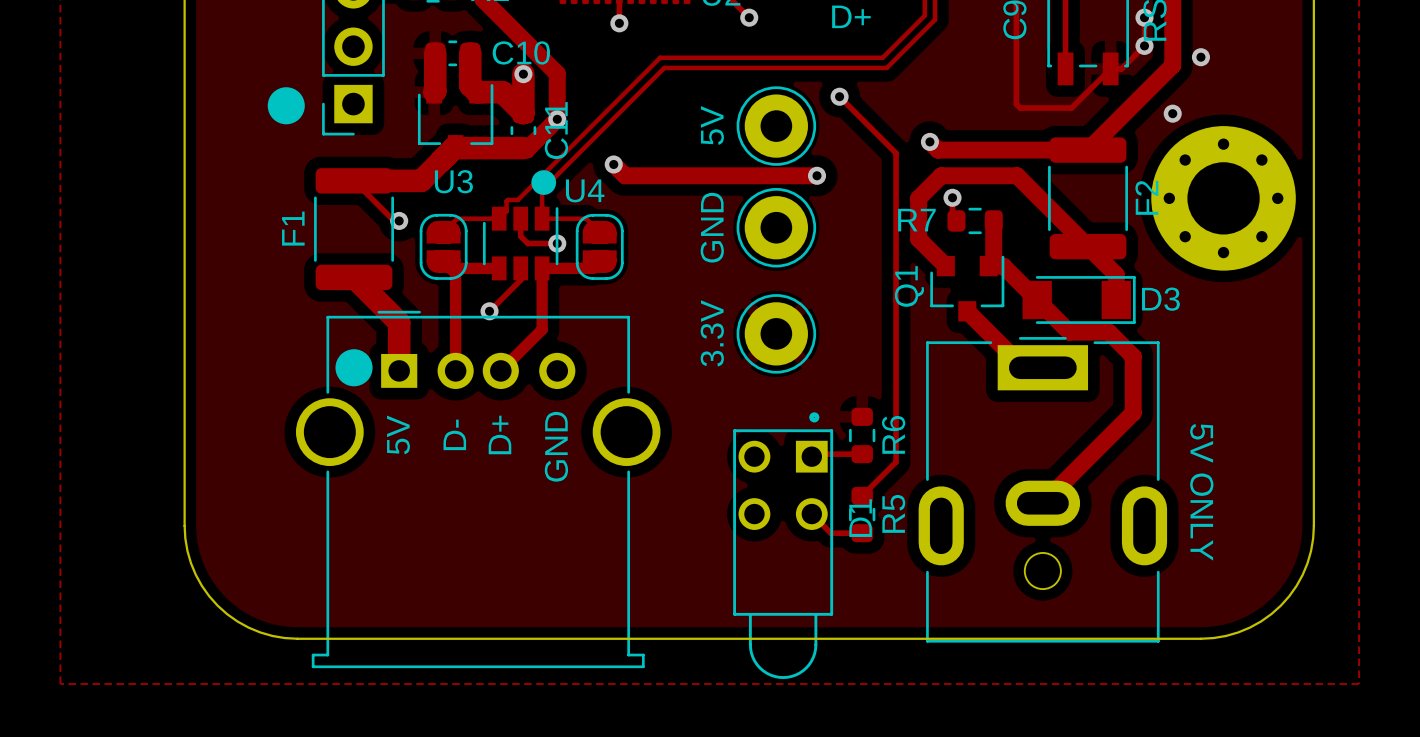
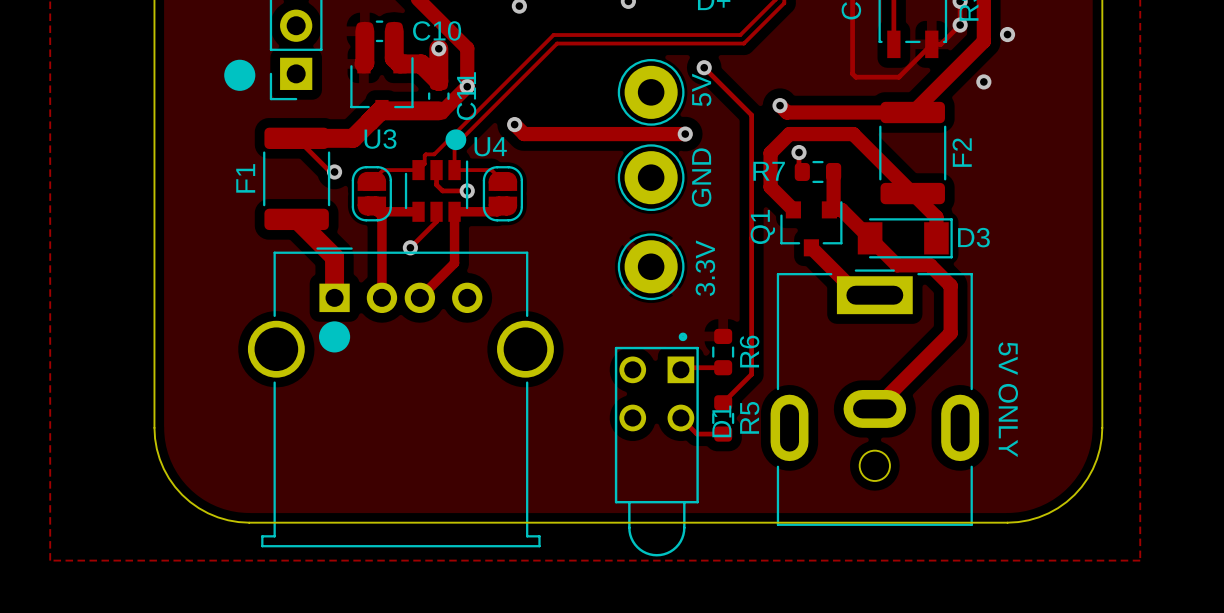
5V name: none -> 5V (701, 89)
5V value: 5V (712, 125) -> none
part: (1223, 198) -> none
GND value: GND (712, 227) -> none
GND name: none -> GND (701, 177)
3.3V value: 3.3V (712, 333) -> none
3.3V name: none -> 3.3V (705, 268)
drawing position: (354, 367) -> (334, 336)
text: 5V (398, 434) -> none
text: D- (454, 434) -> none
text: D+ (499, 434) -> none
text: GND (556, 446) -> none

